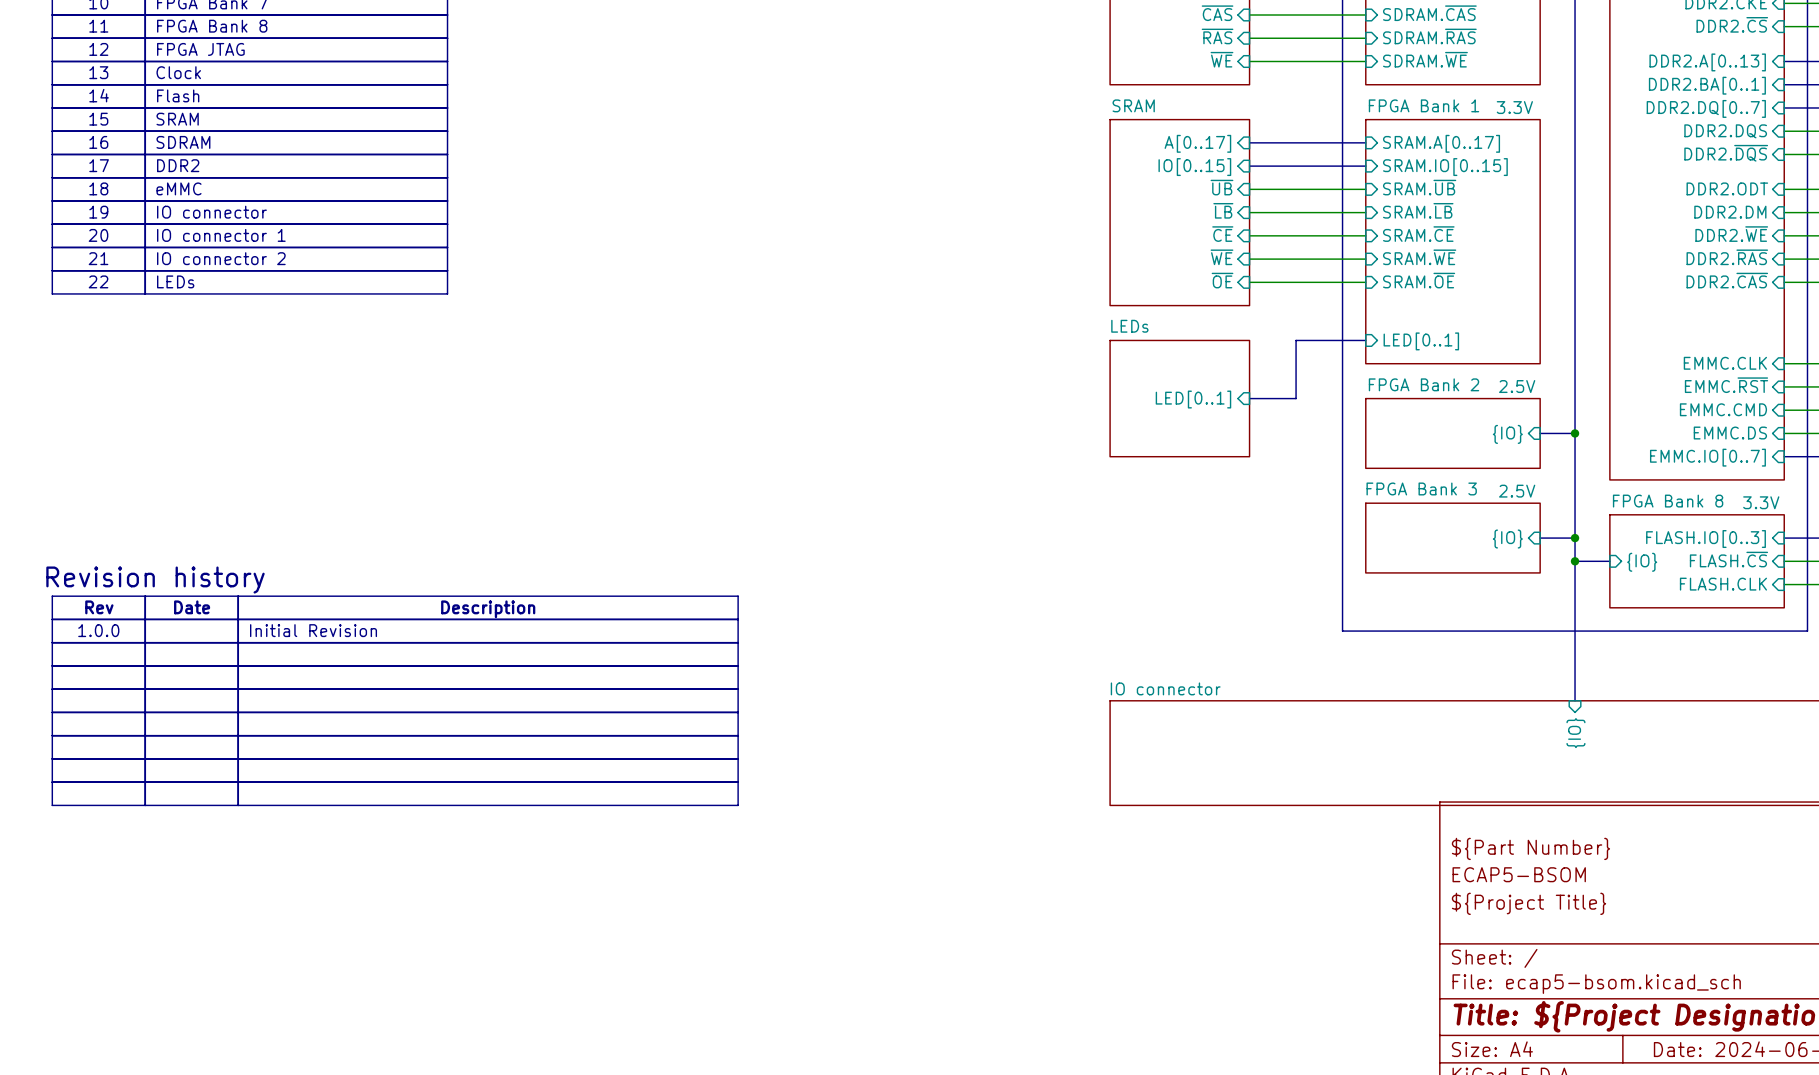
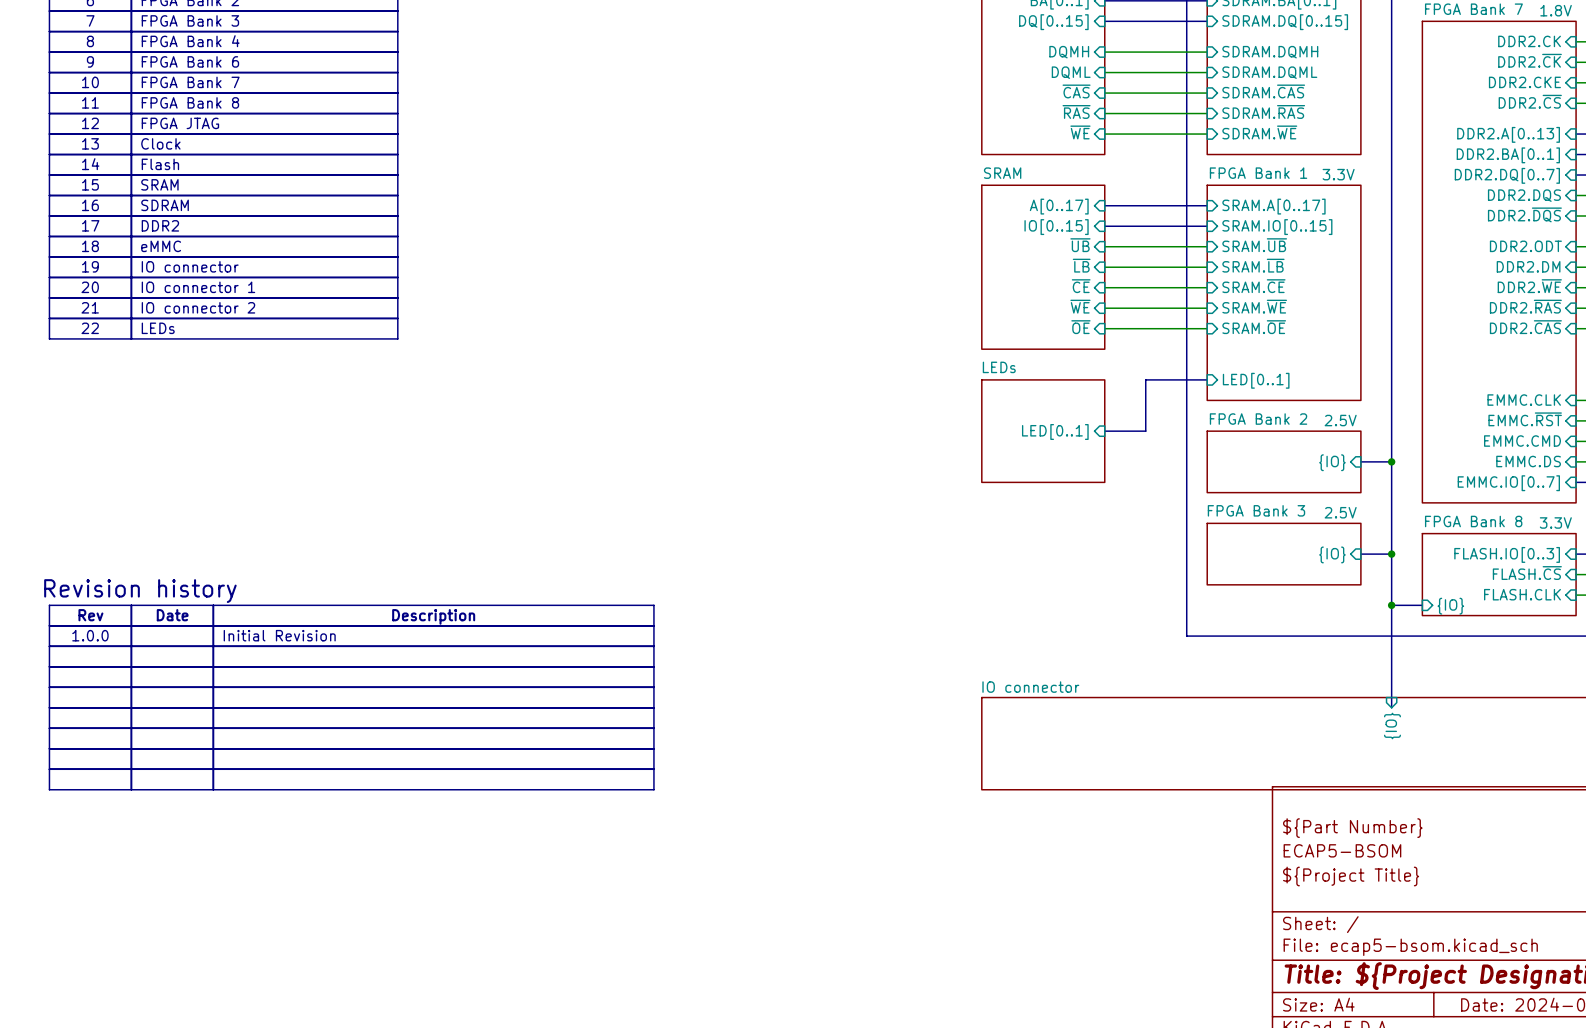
bus: (1575, 561) (1609, 561) -> (1391, 605) (1422, 605)
junction position: (1575, 561) -> (1391, 605)
sheet pin position: {IO} (1642, 562) -> {IO} (1450, 606)
bus: none -> (1391, 697) (1391, 707)

